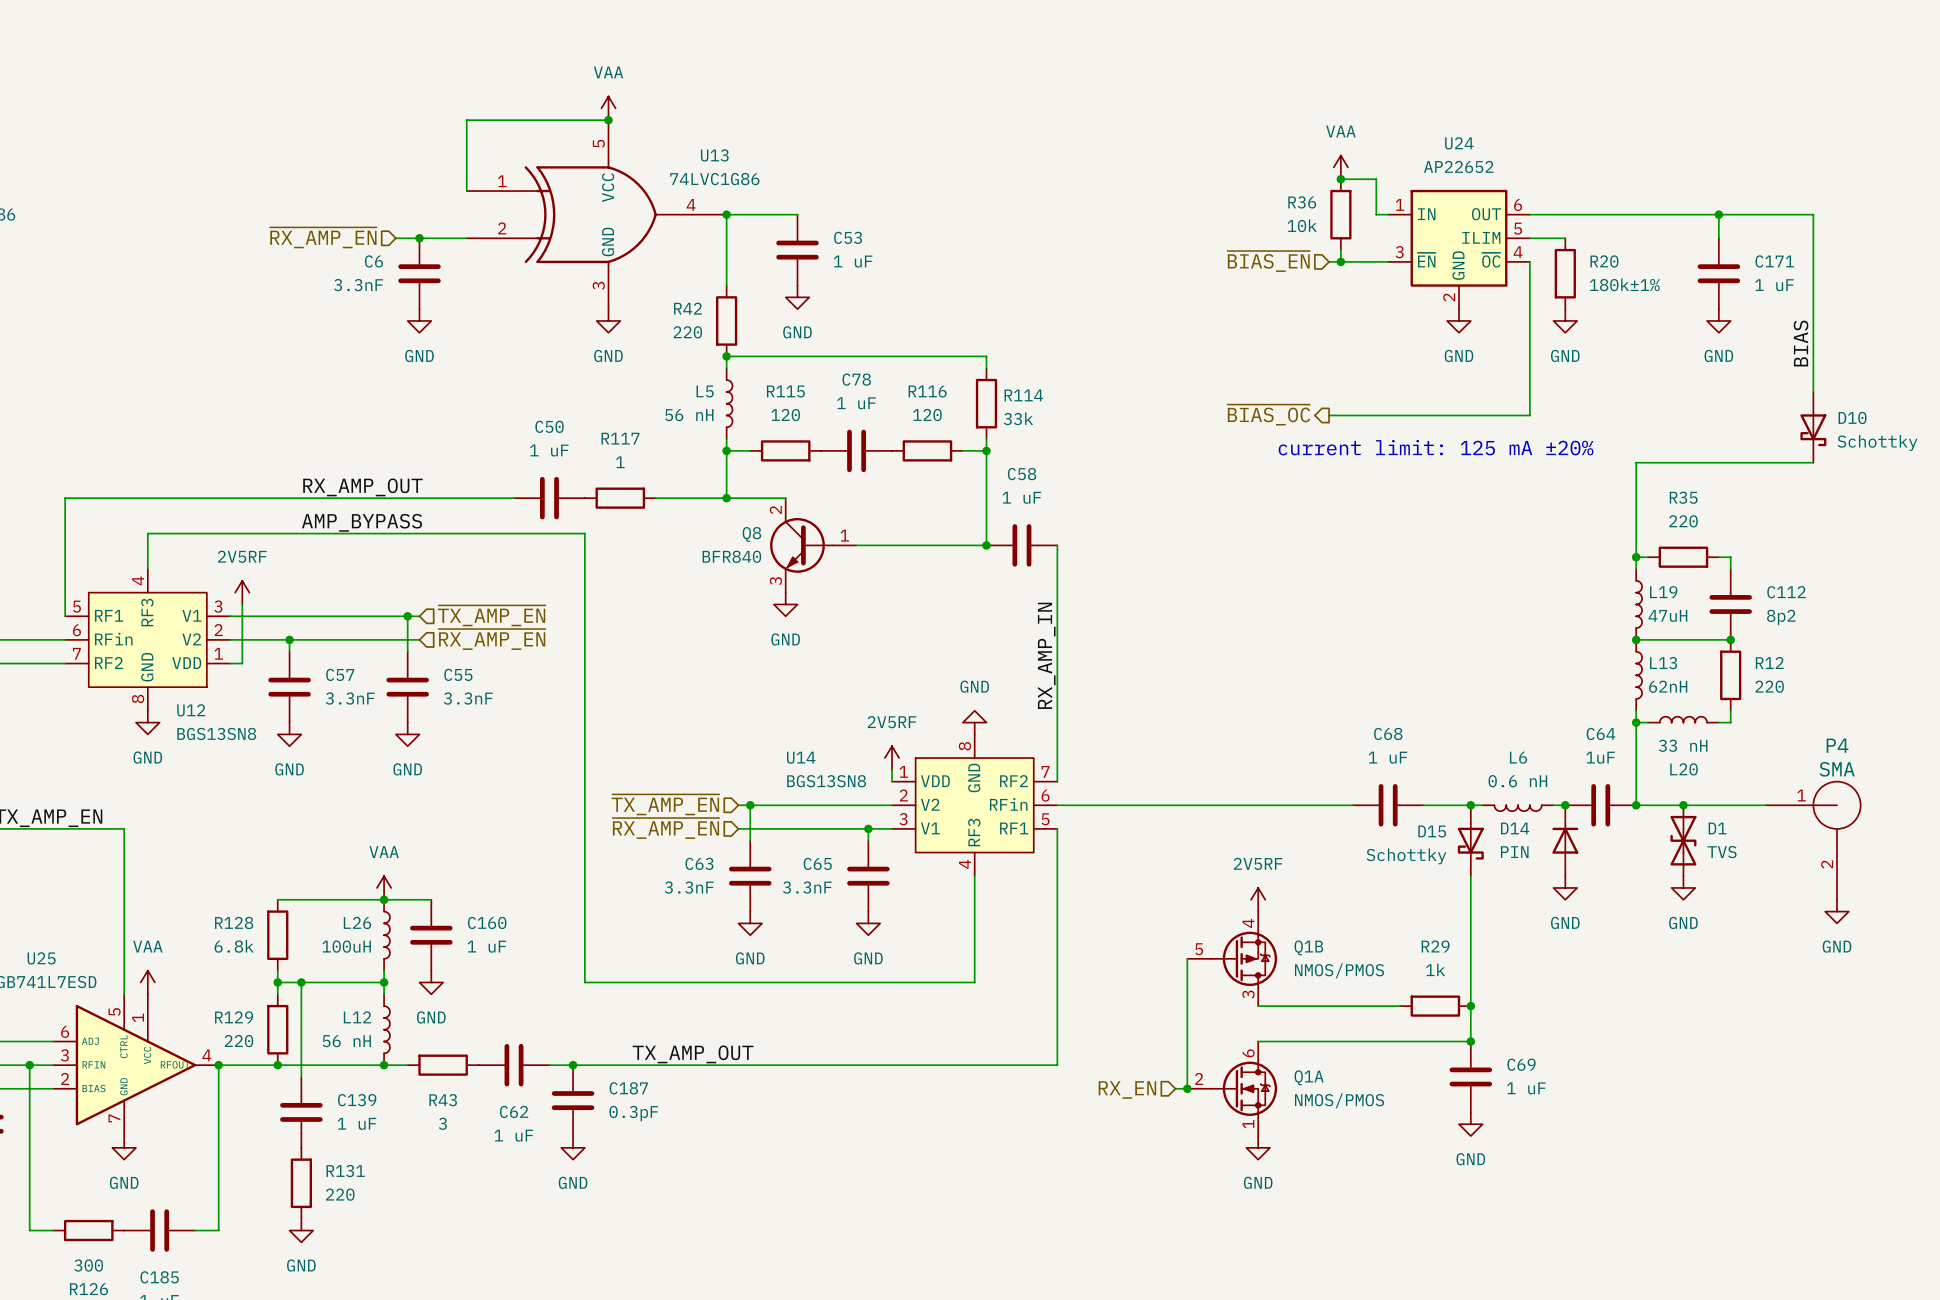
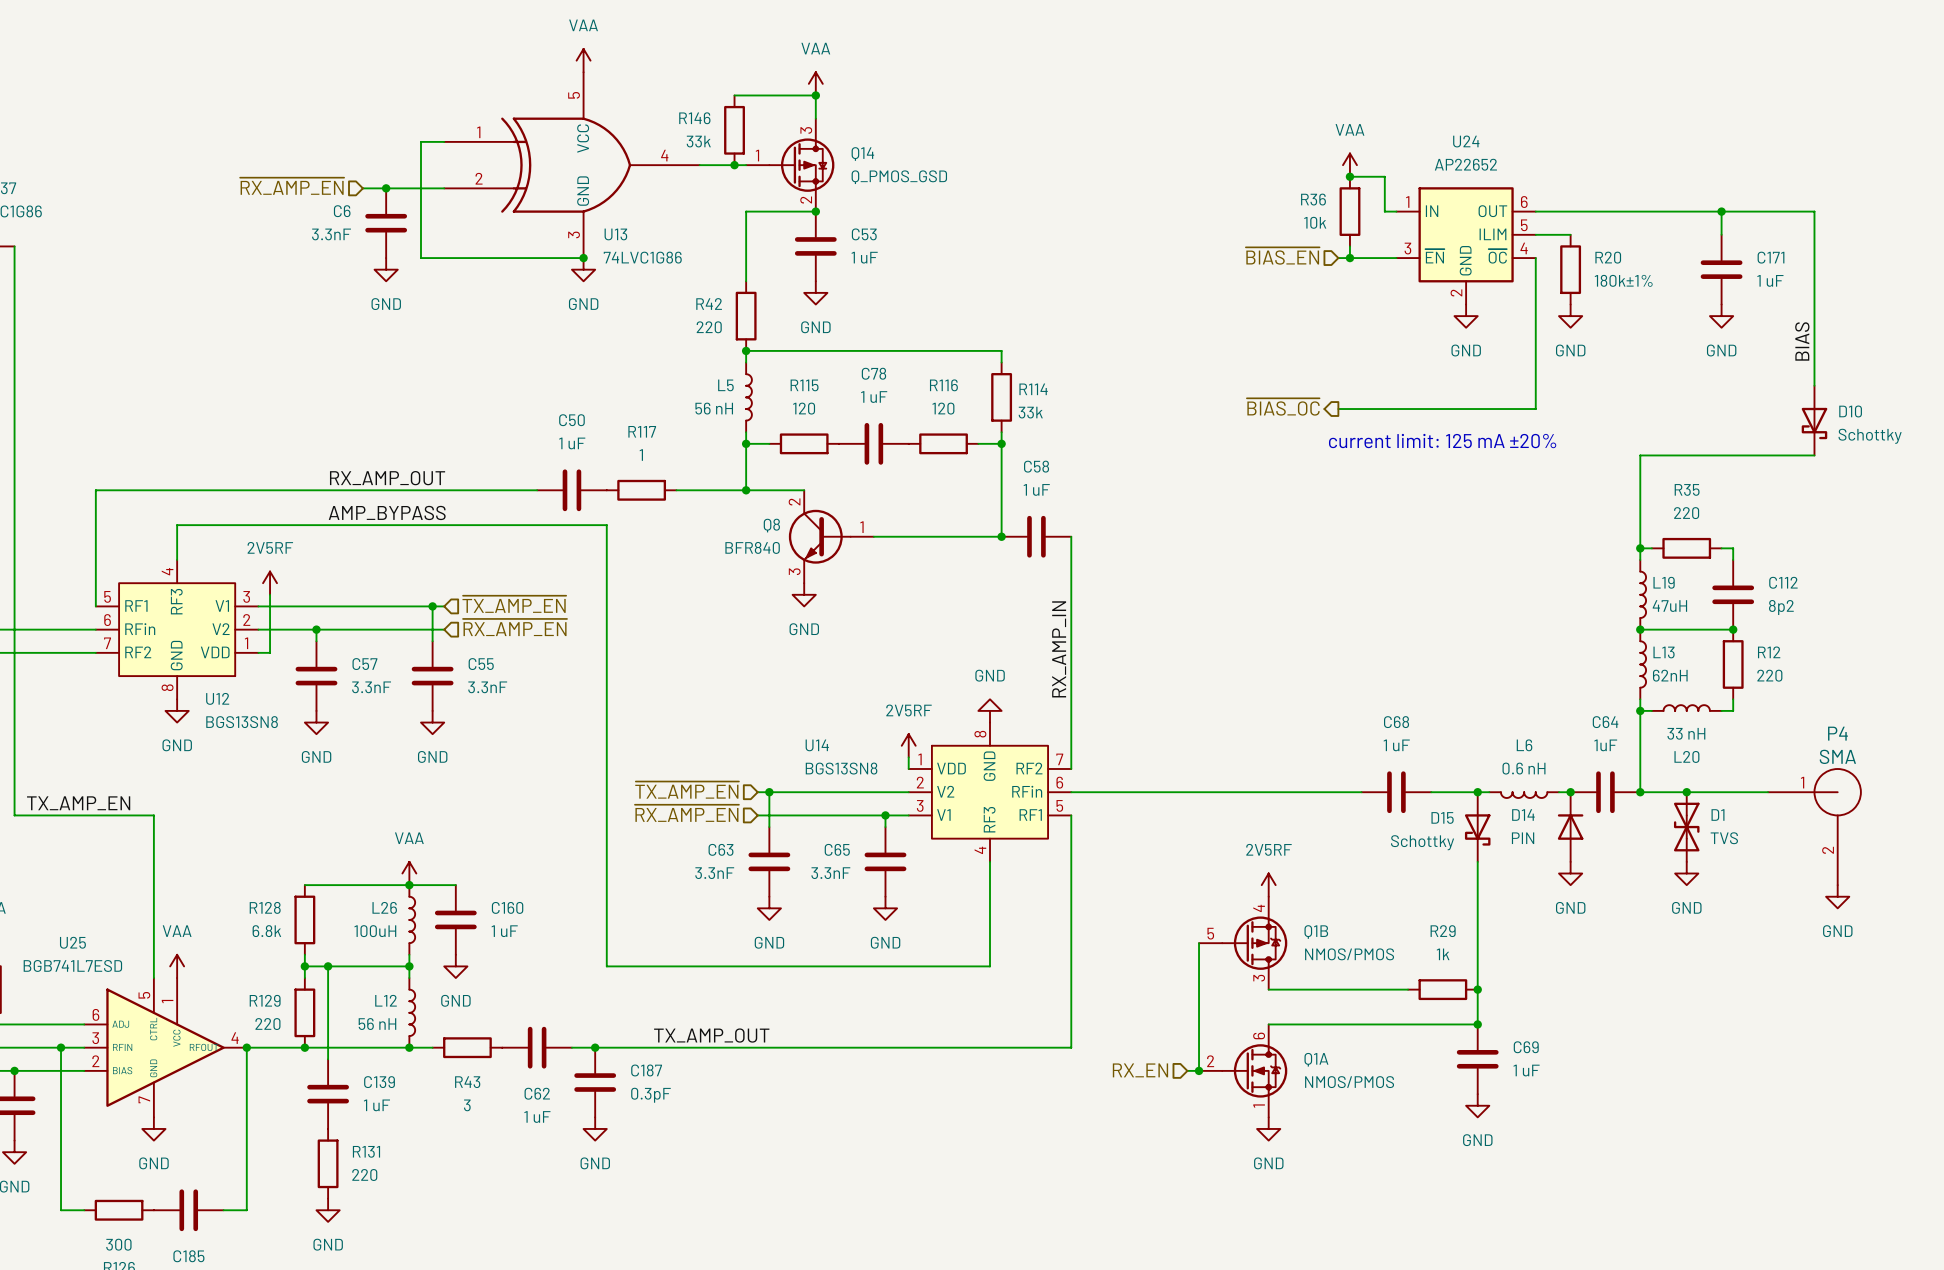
power symbol: none -> VAA (815, 83)
wire: none -> (734, 95) (815, 95) (815, 118)
junction: none -> (815, 95)
power symbol position: VAA (608, 108) -> VAA (583, 60)
wire: (608, 120) (466, 120) (466, 191) -> none
junction: (608, 120) -> none
R146: none -> 33k (734, 130)
wire: none -> (444, 141) (420, 141) (420, 258) (583, 258)
U13 name position: U13 (714, 155) -> U13 (615, 234)
wire: none -> (699, 165) (746, 165)
junction: none -> (734, 165)
Q14: none -> Q_PMOS_GSD (790, 165)
U13 value position: 74LVC1G86 (714, 179) -> 74LVC1G86 (642, 257)
wire: none -> (362, 188) (444, 188)
junction: none -> (386, 188)
U13 position: (596, 214) -> (571, 165)
junction: (726, 214) -> none
junction: none -> (815, 211)
hierarchical label position: ~{RX_AMP_EN} (323, 237) -> ~{RX_AMP_EN} (292, 186)
wire: (395, 238) (466, 238) -> none
junction: (419, 238) -> none
junction: none -> (583, 258)
power symbol: none -> GND (386, 269)
C6 position: (419, 273) -> (386, 223)
power symbol: GND (419, 320) -> none
power symbol position: GND (608, 320) -> GND (583, 269)

